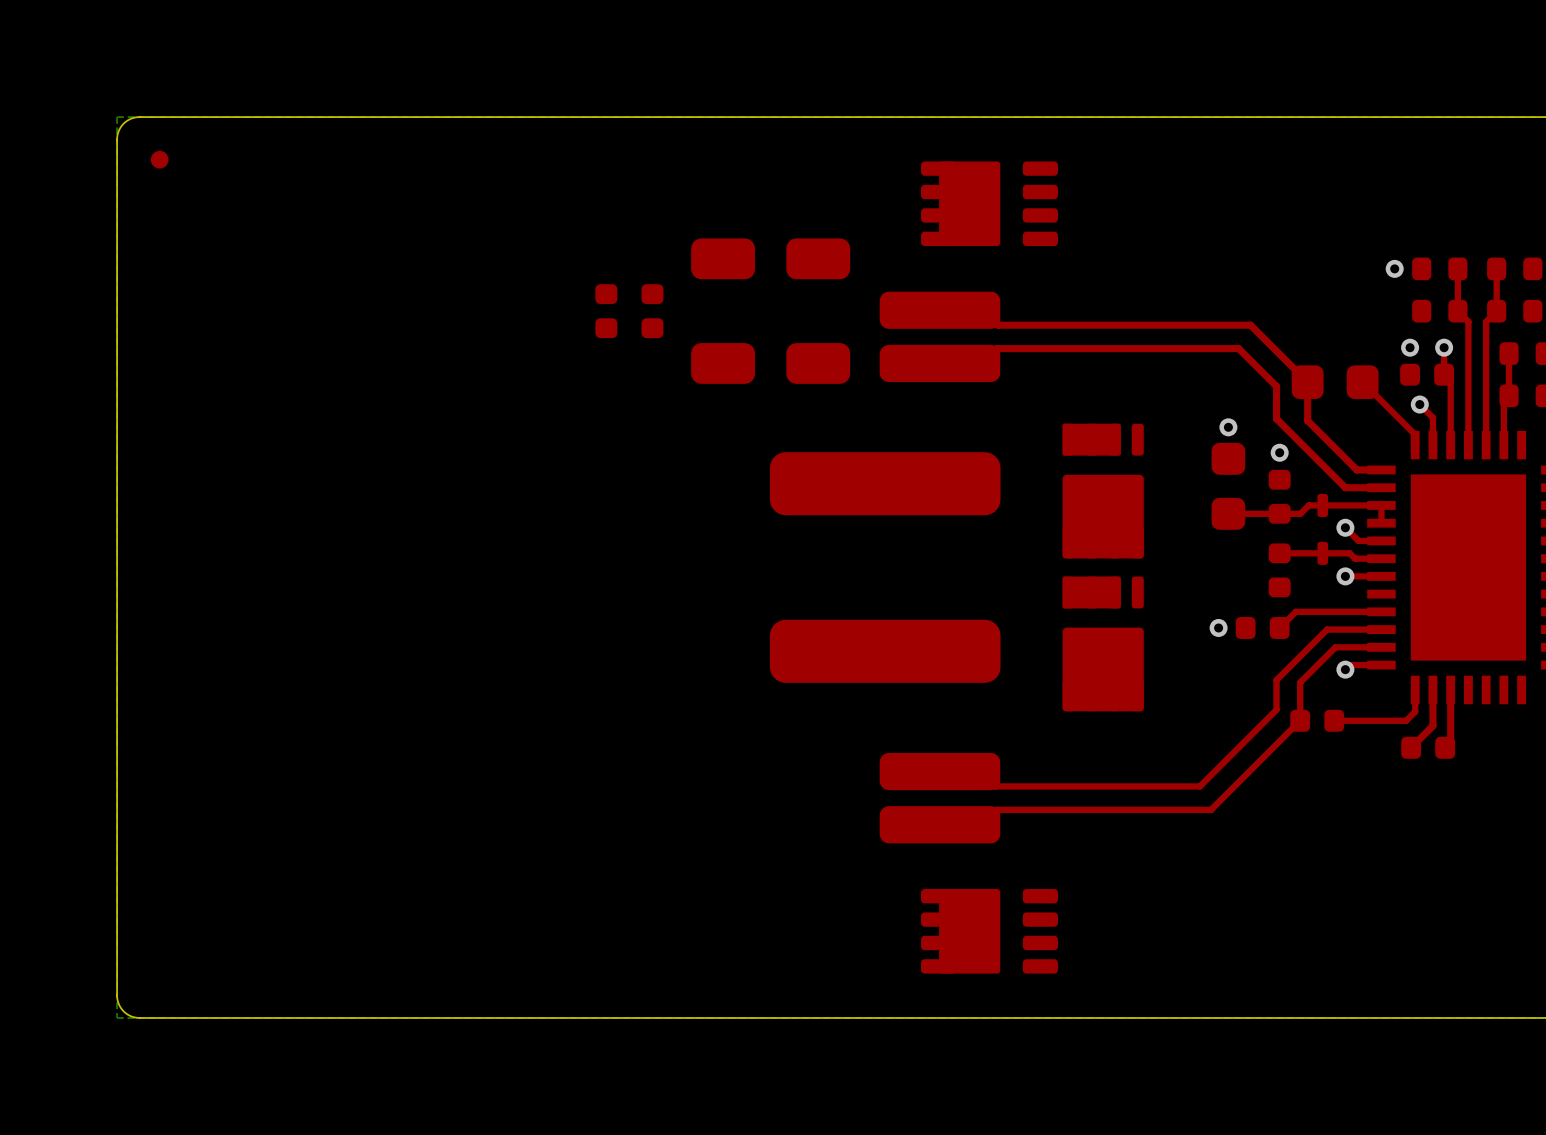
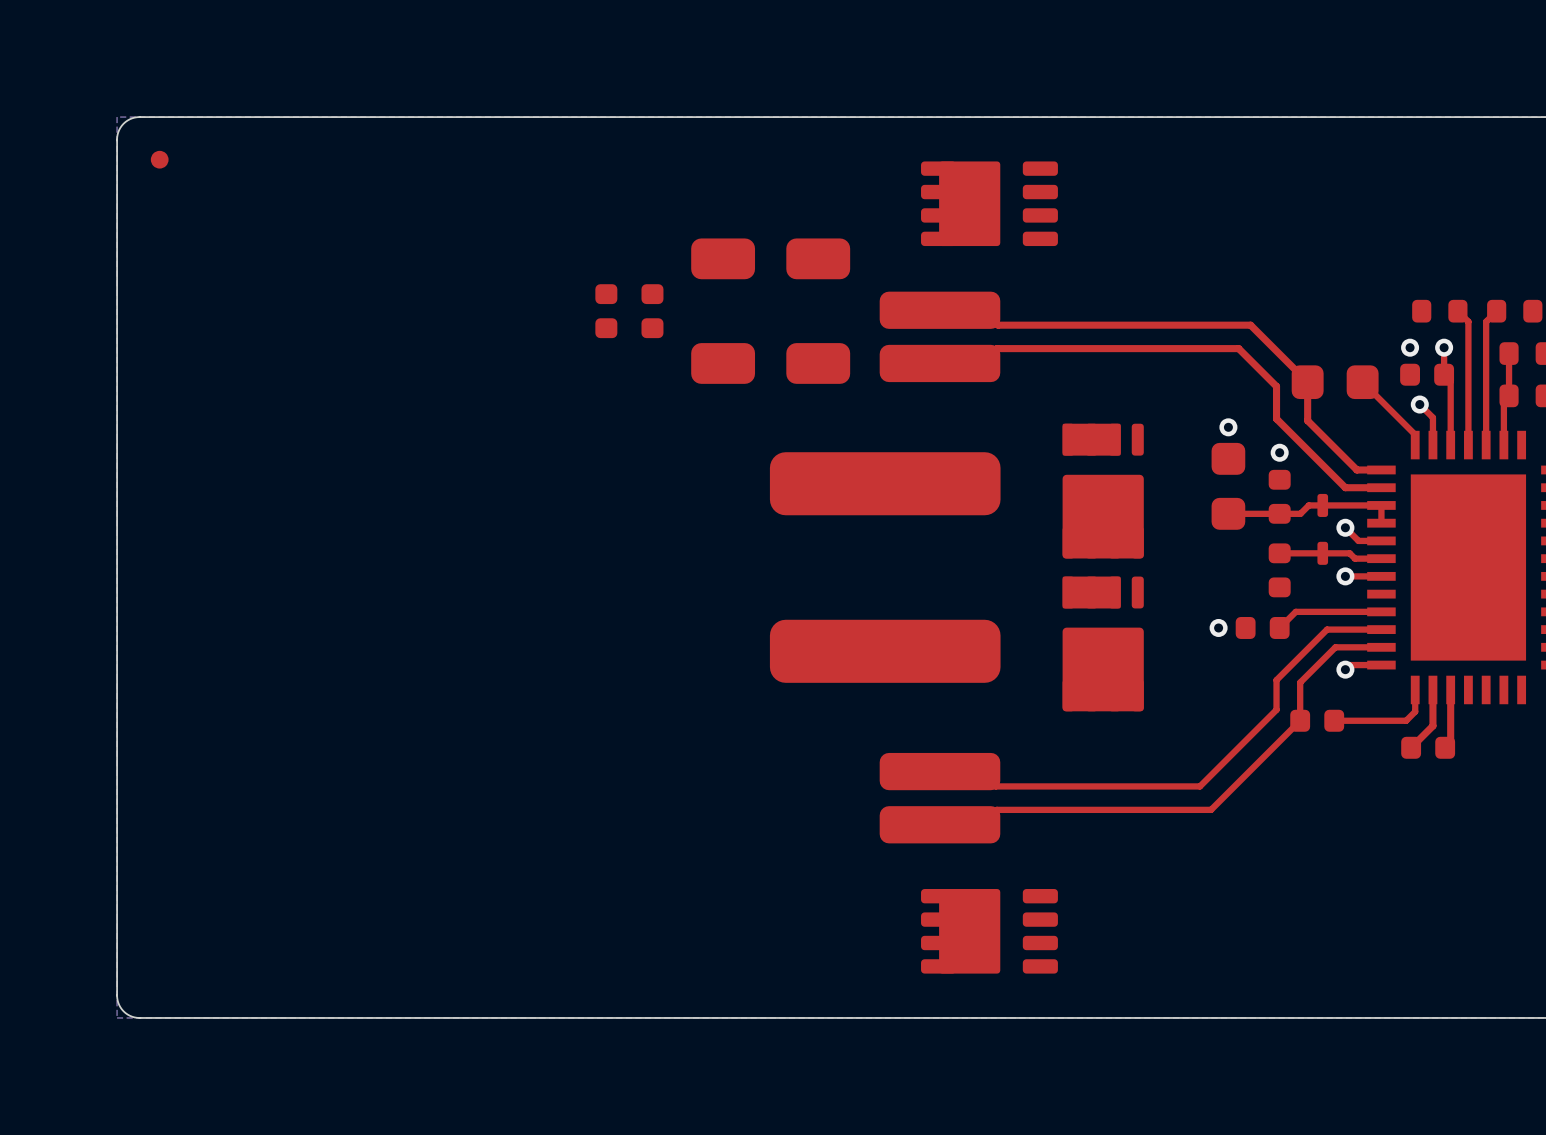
via: (1394, 268) -> none
part: (1439, 268) -> none
top track: (1457, 268) (1457, 311) -> none
top track: (1496, 268) (1496, 311) -> none
part: (1514, 268) -> none

